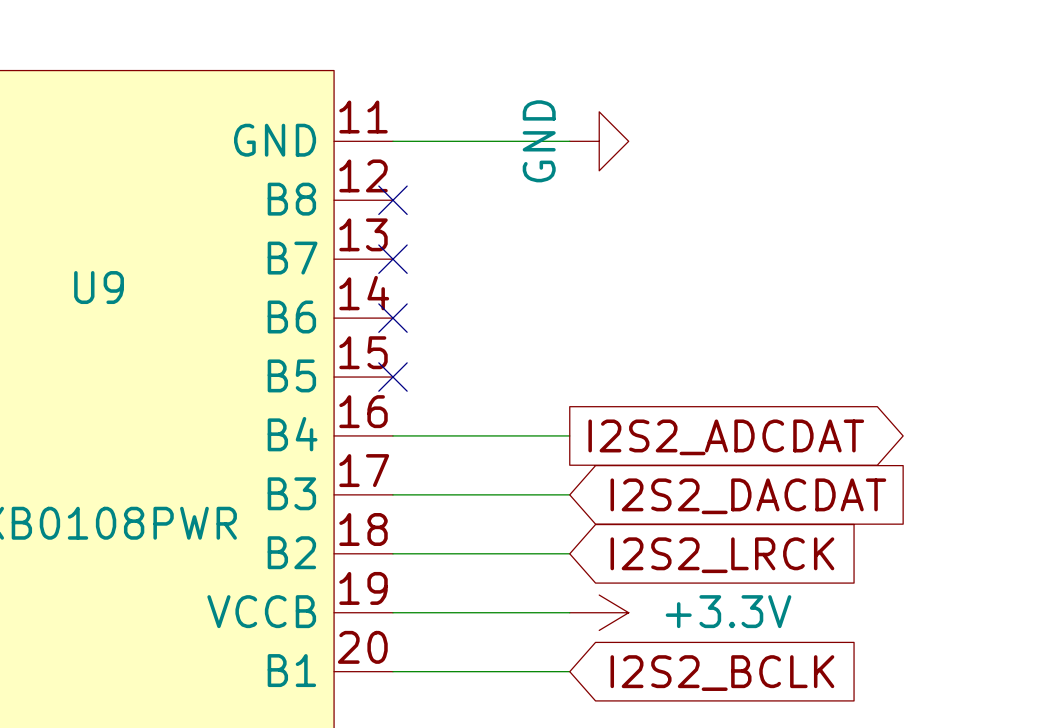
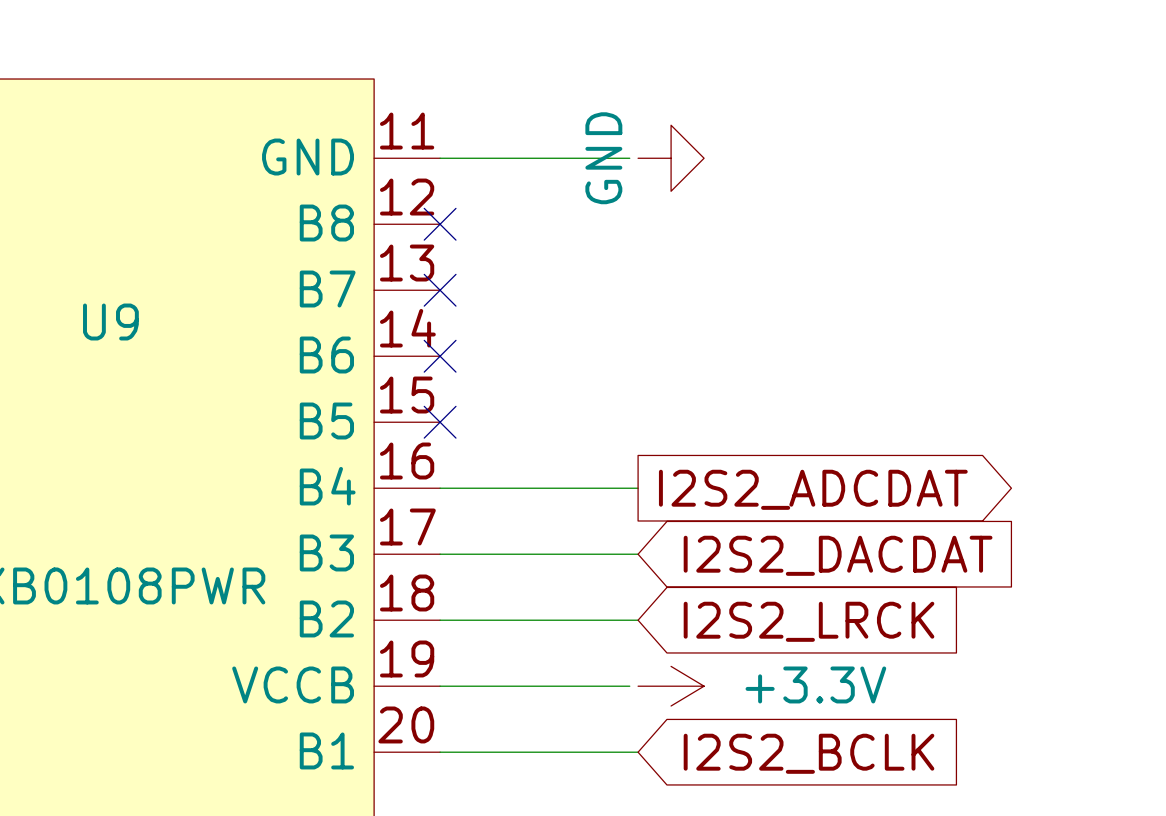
wire: (562, 141) (569, 141) -> none
wire: (562, 612) (569, 612) -> none

